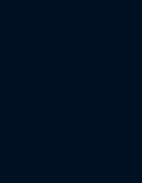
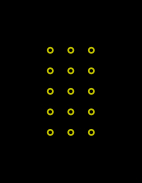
part: none -> (70, 91)

